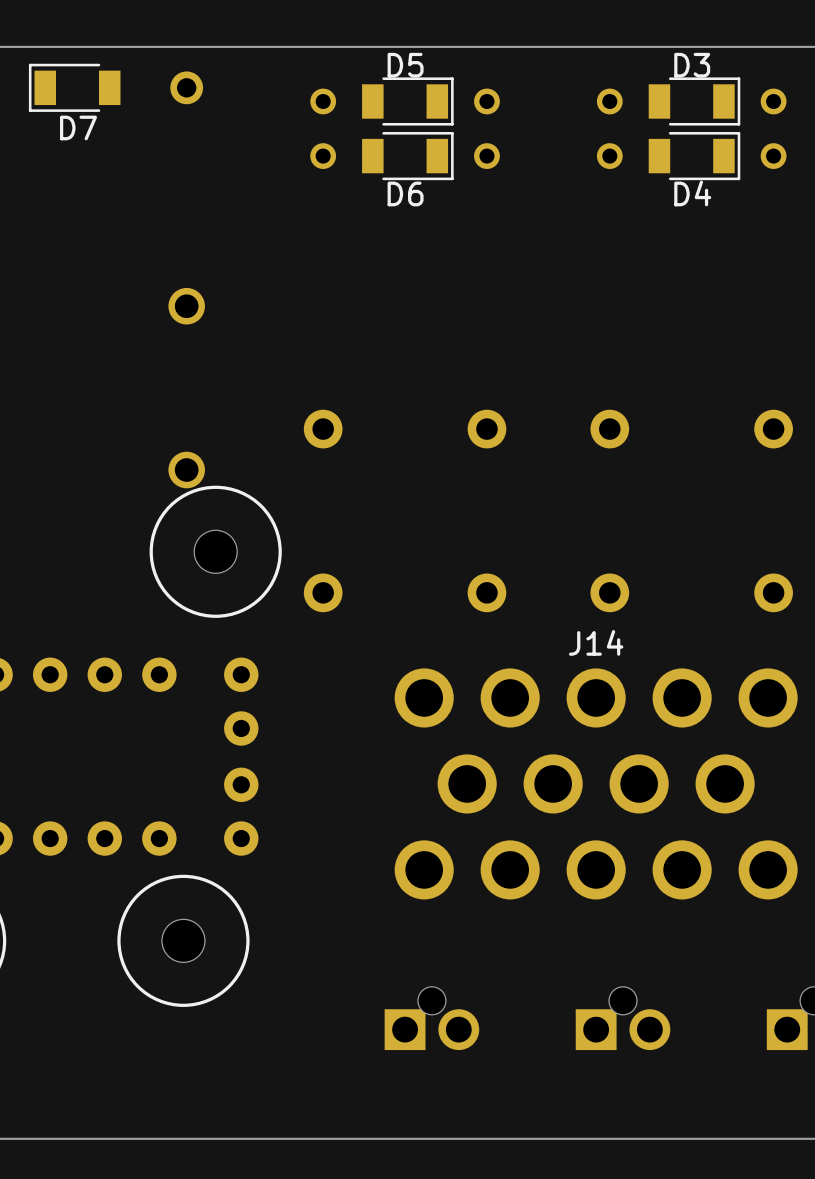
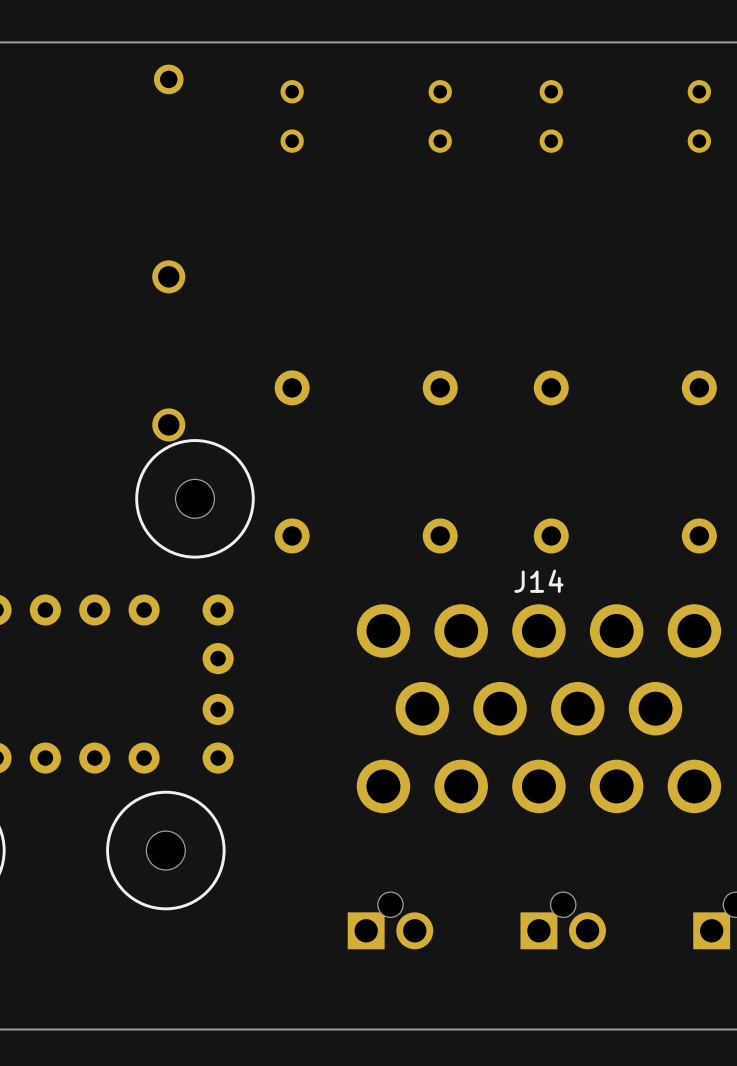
D7: (74, 87) -> none
D5: (407, 101) -> none
D3: (694, 101) -> none
D6: (407, 156) -> none
D4: (694, 156) -> none

